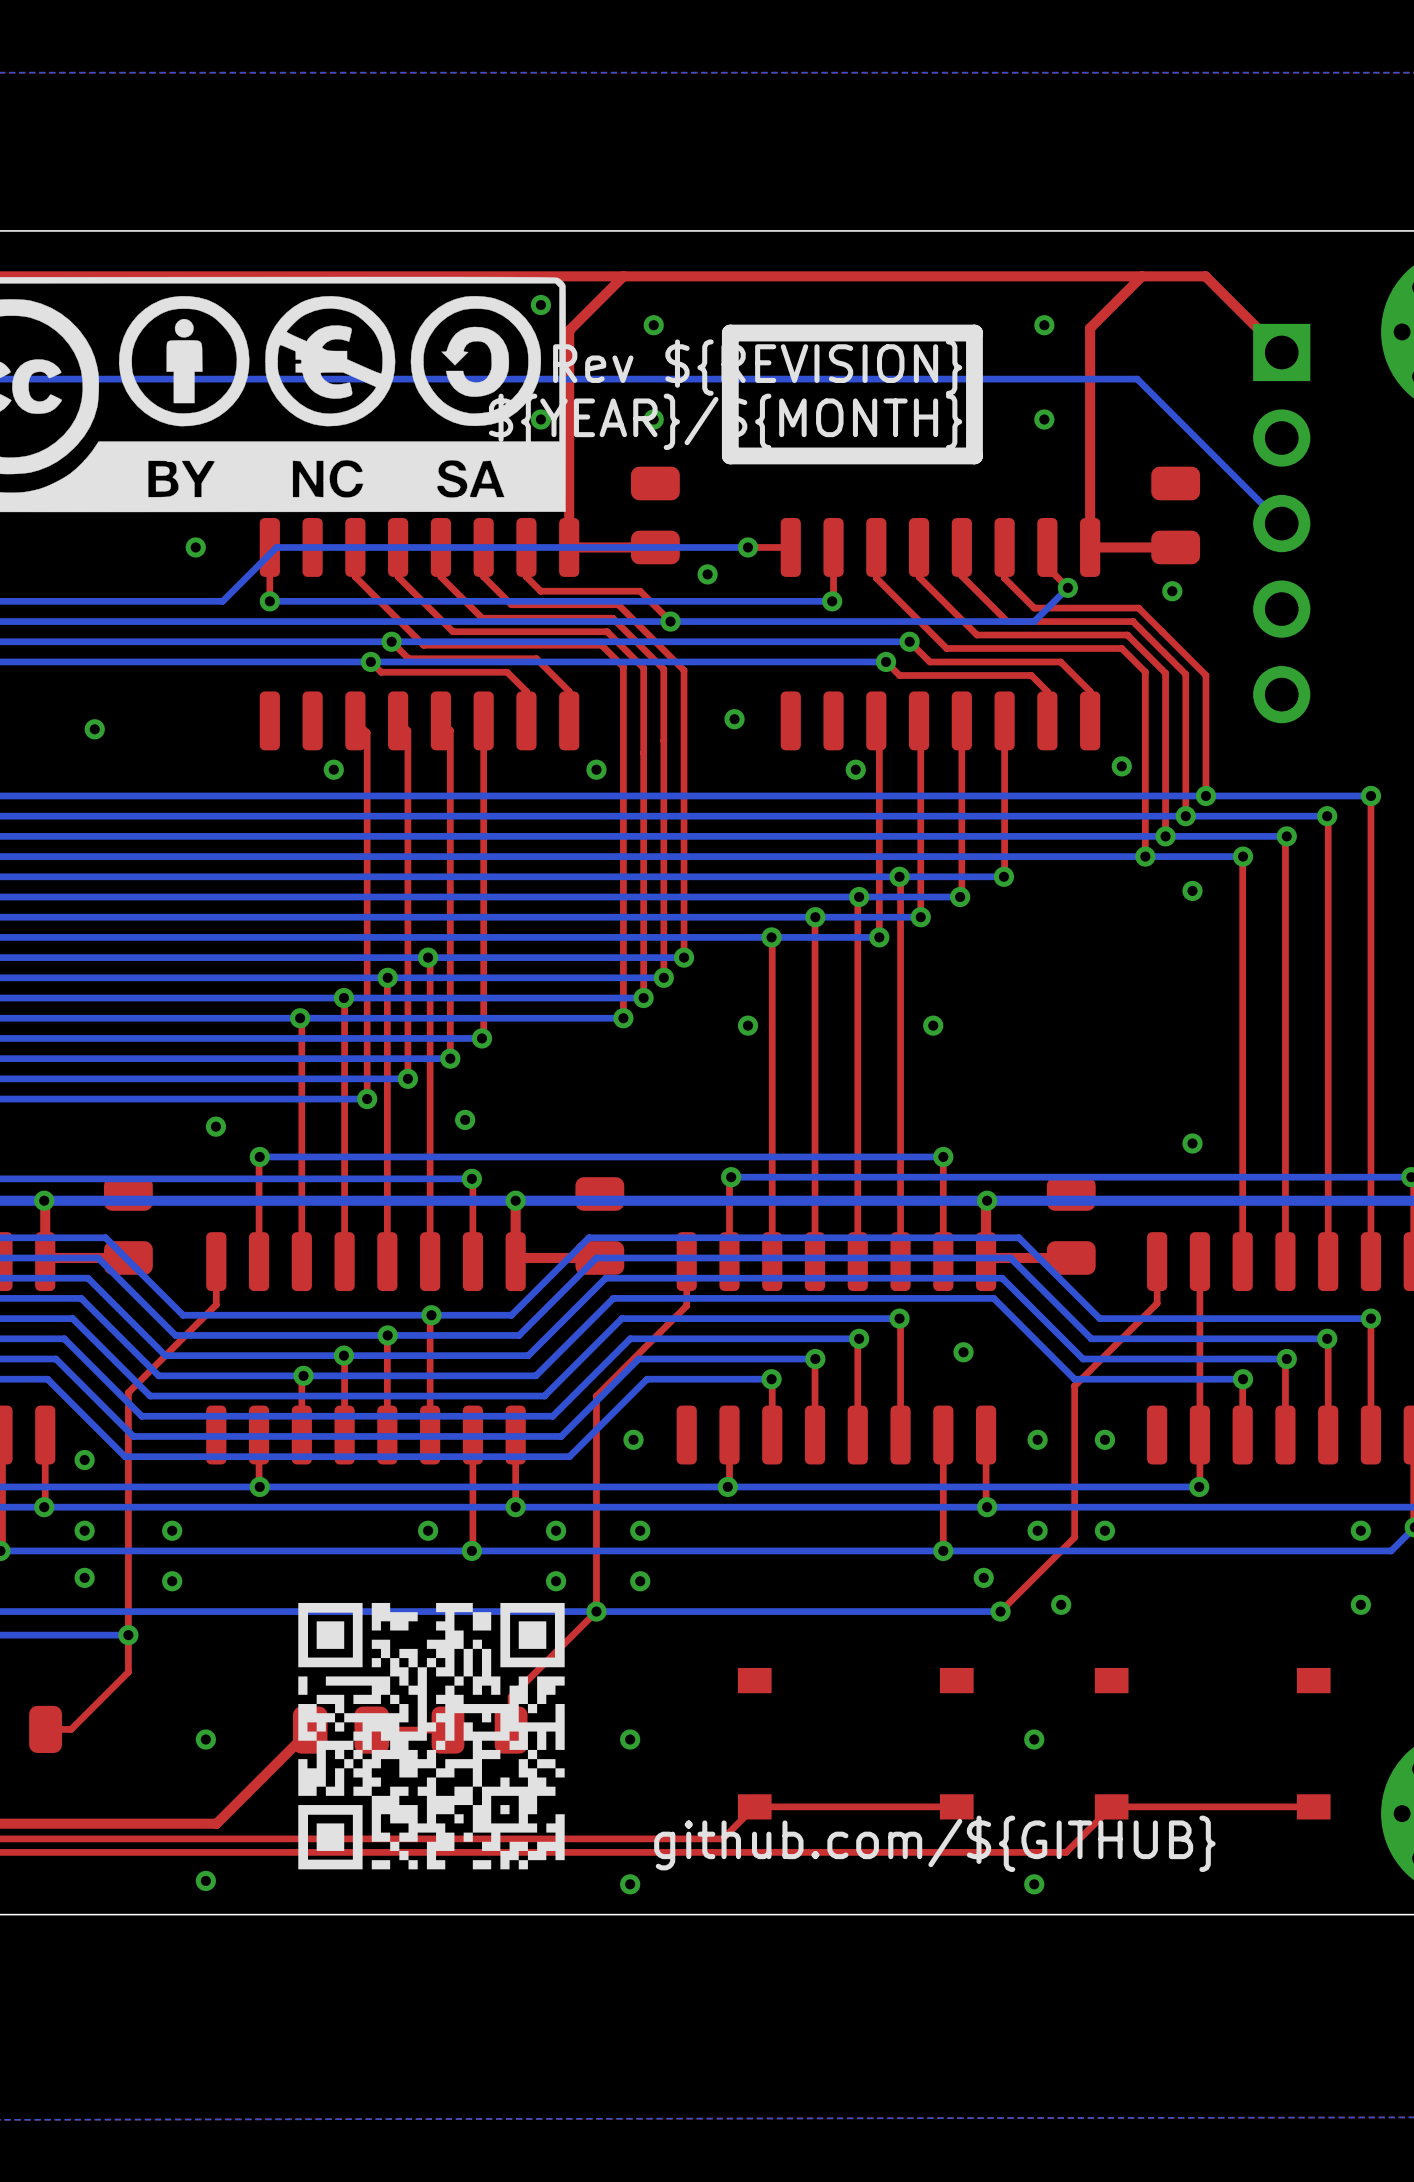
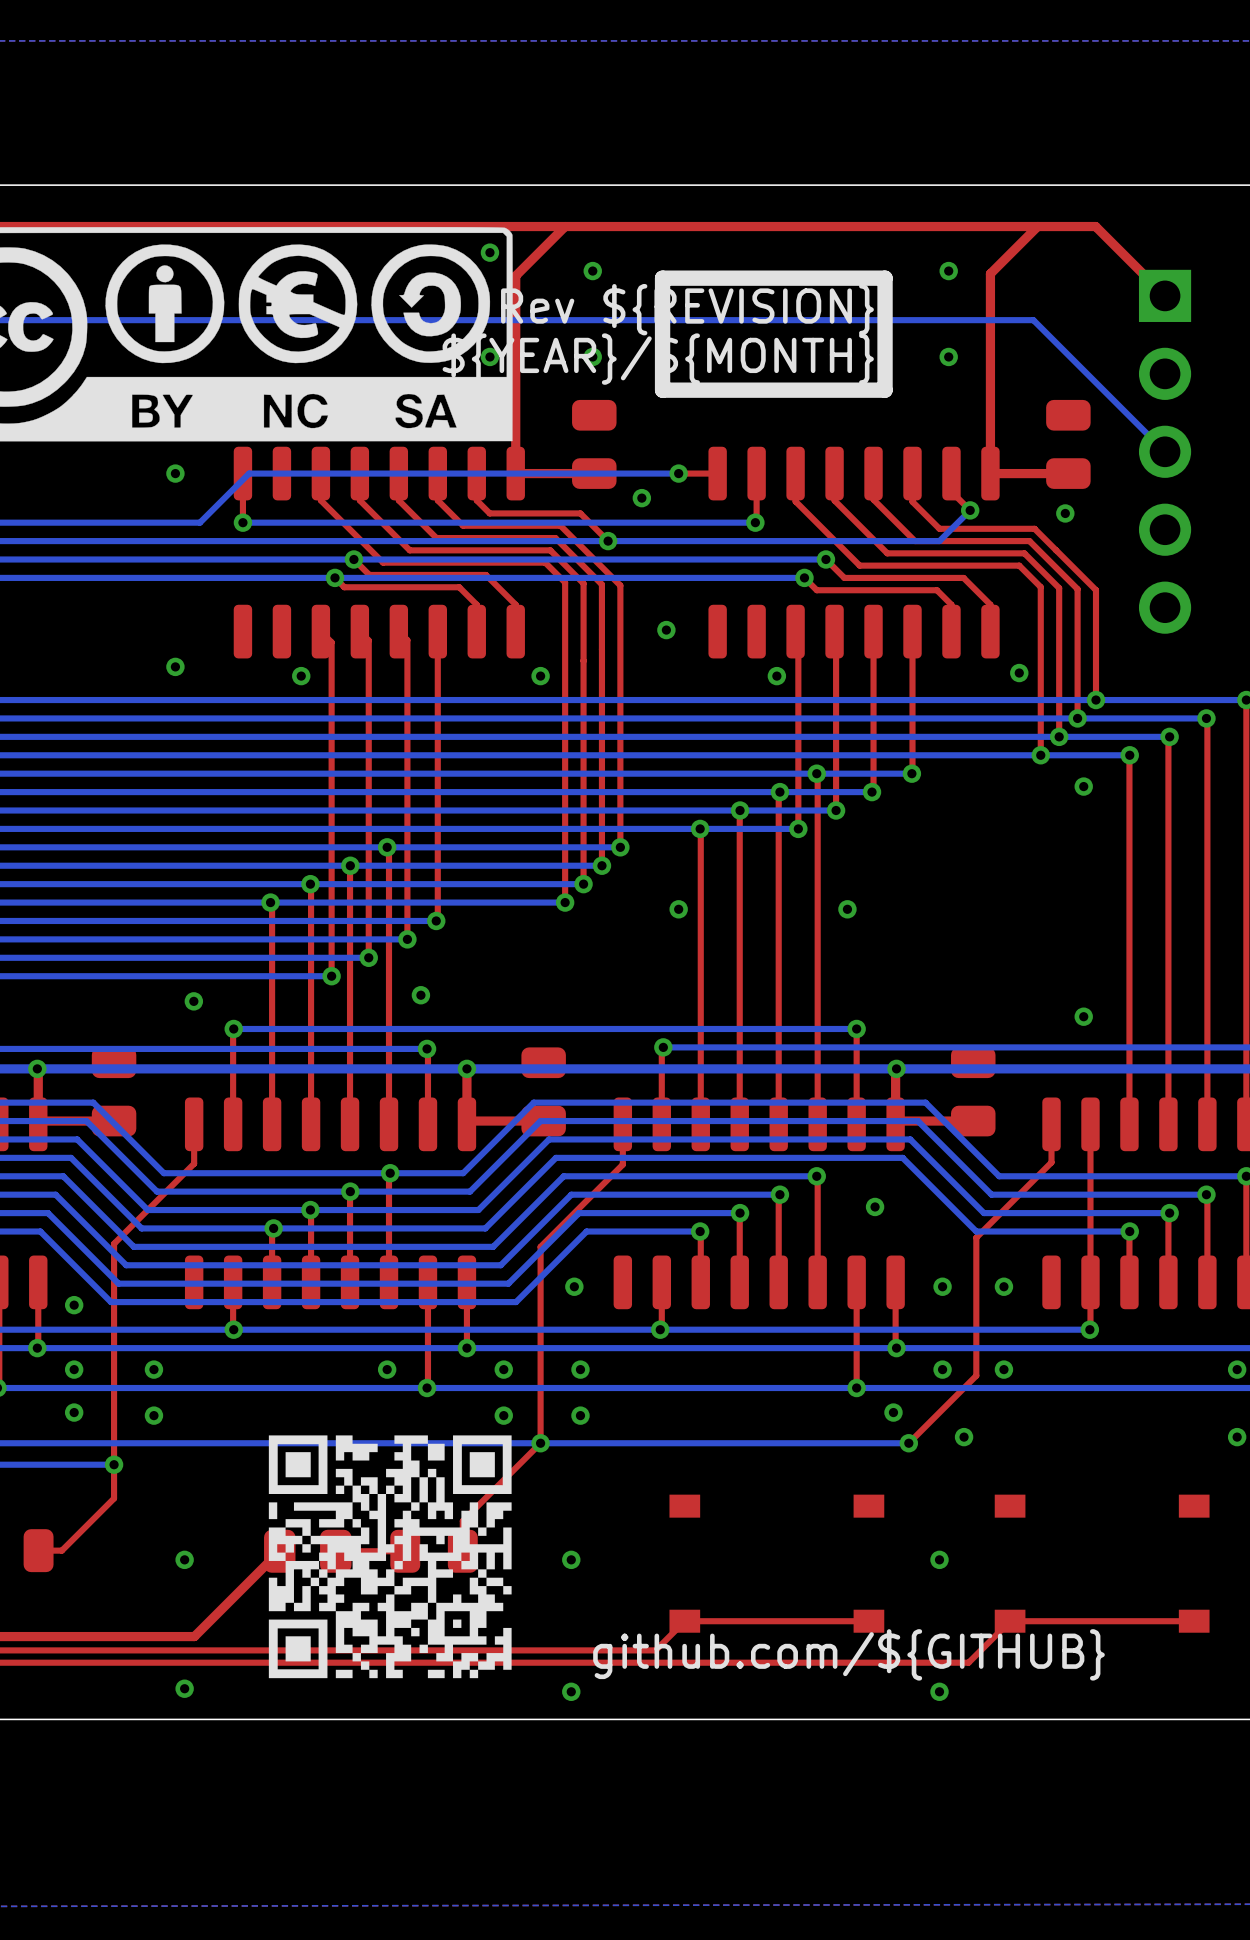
via position: (94, 729) -> (175, 666)

